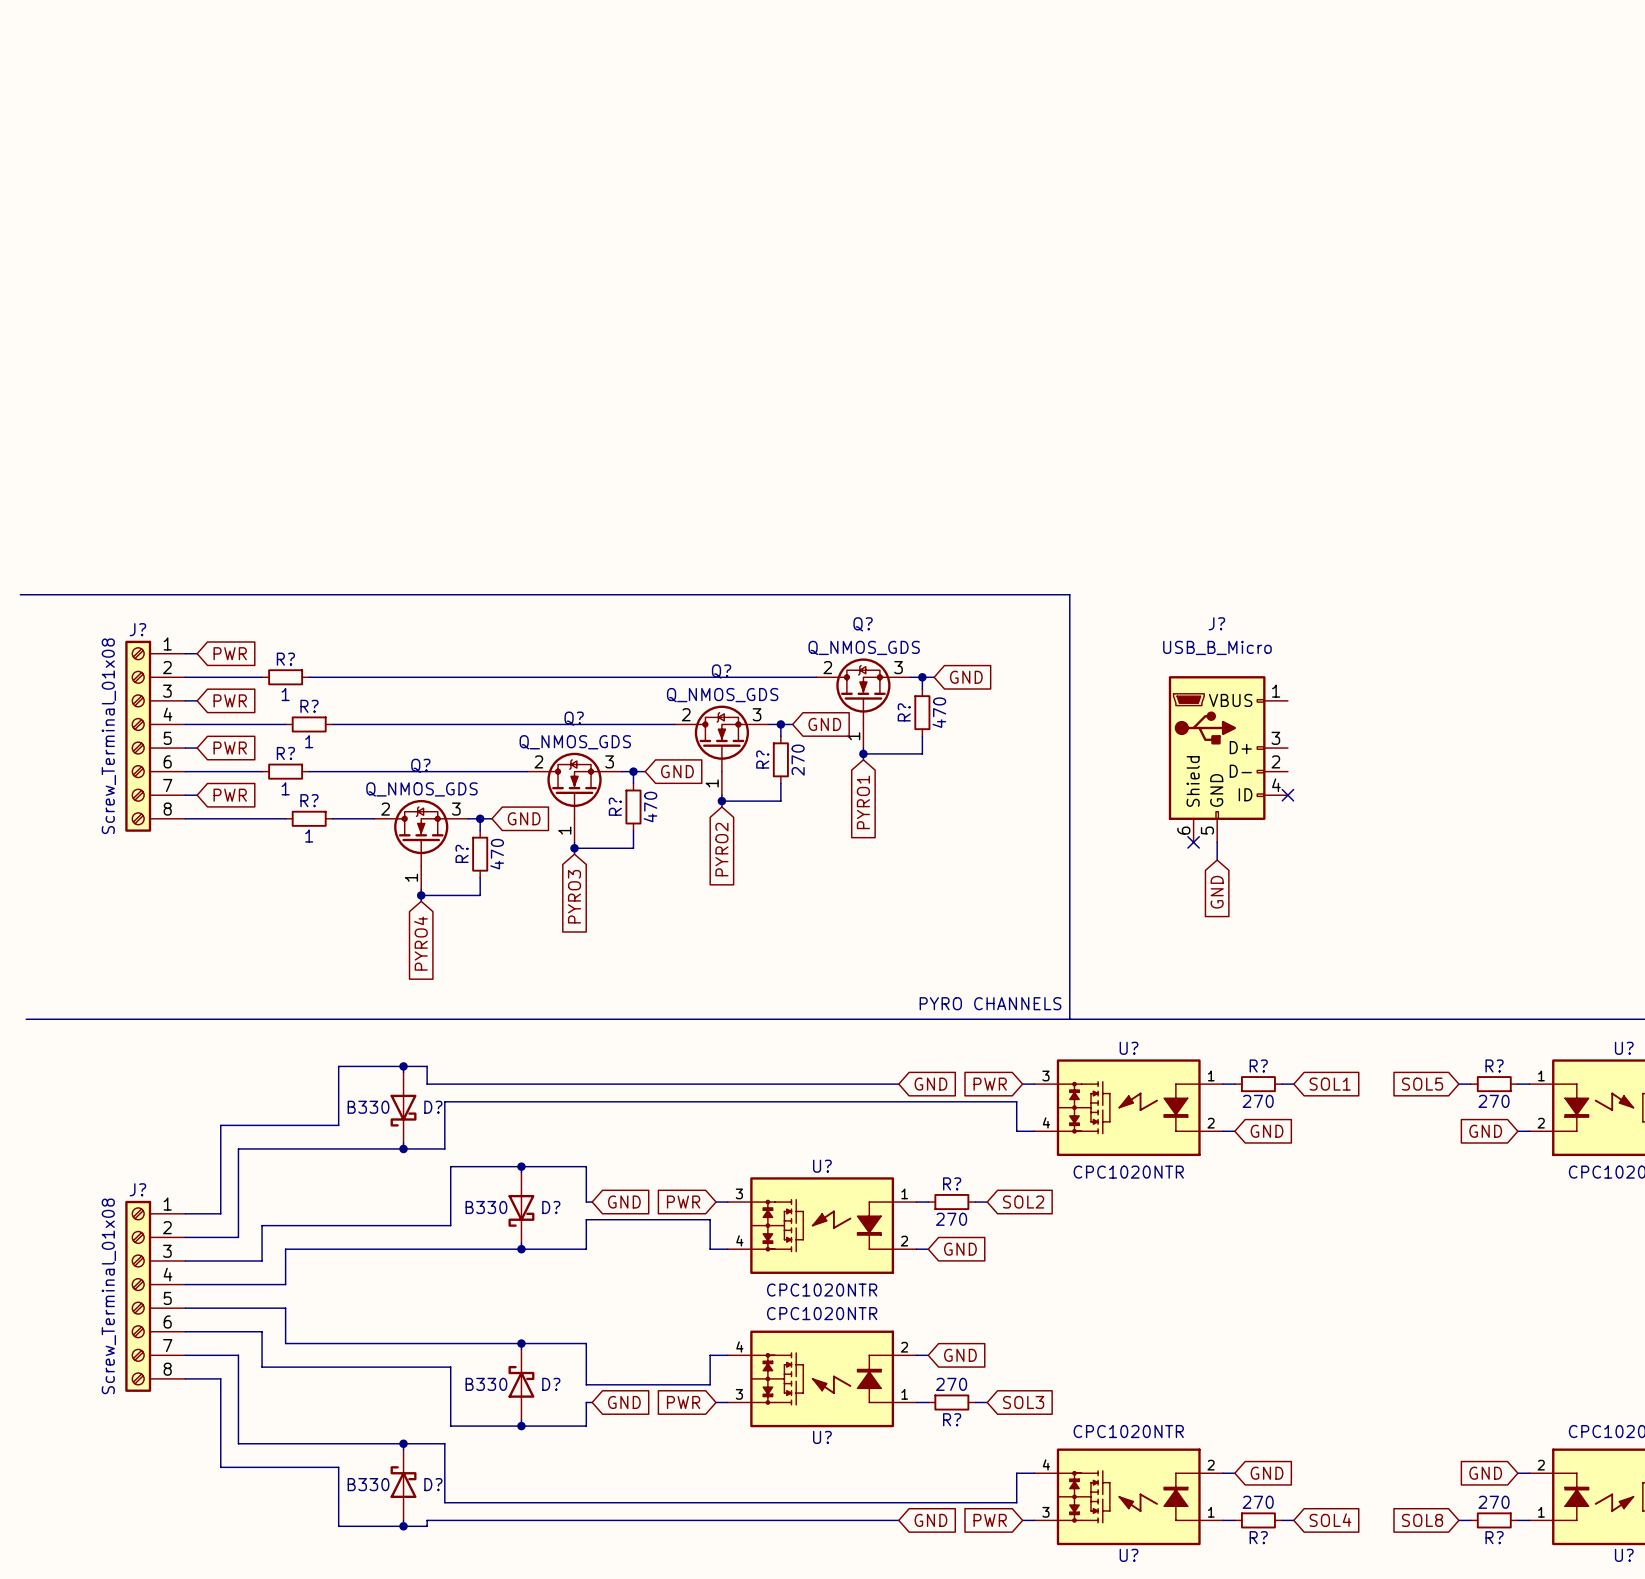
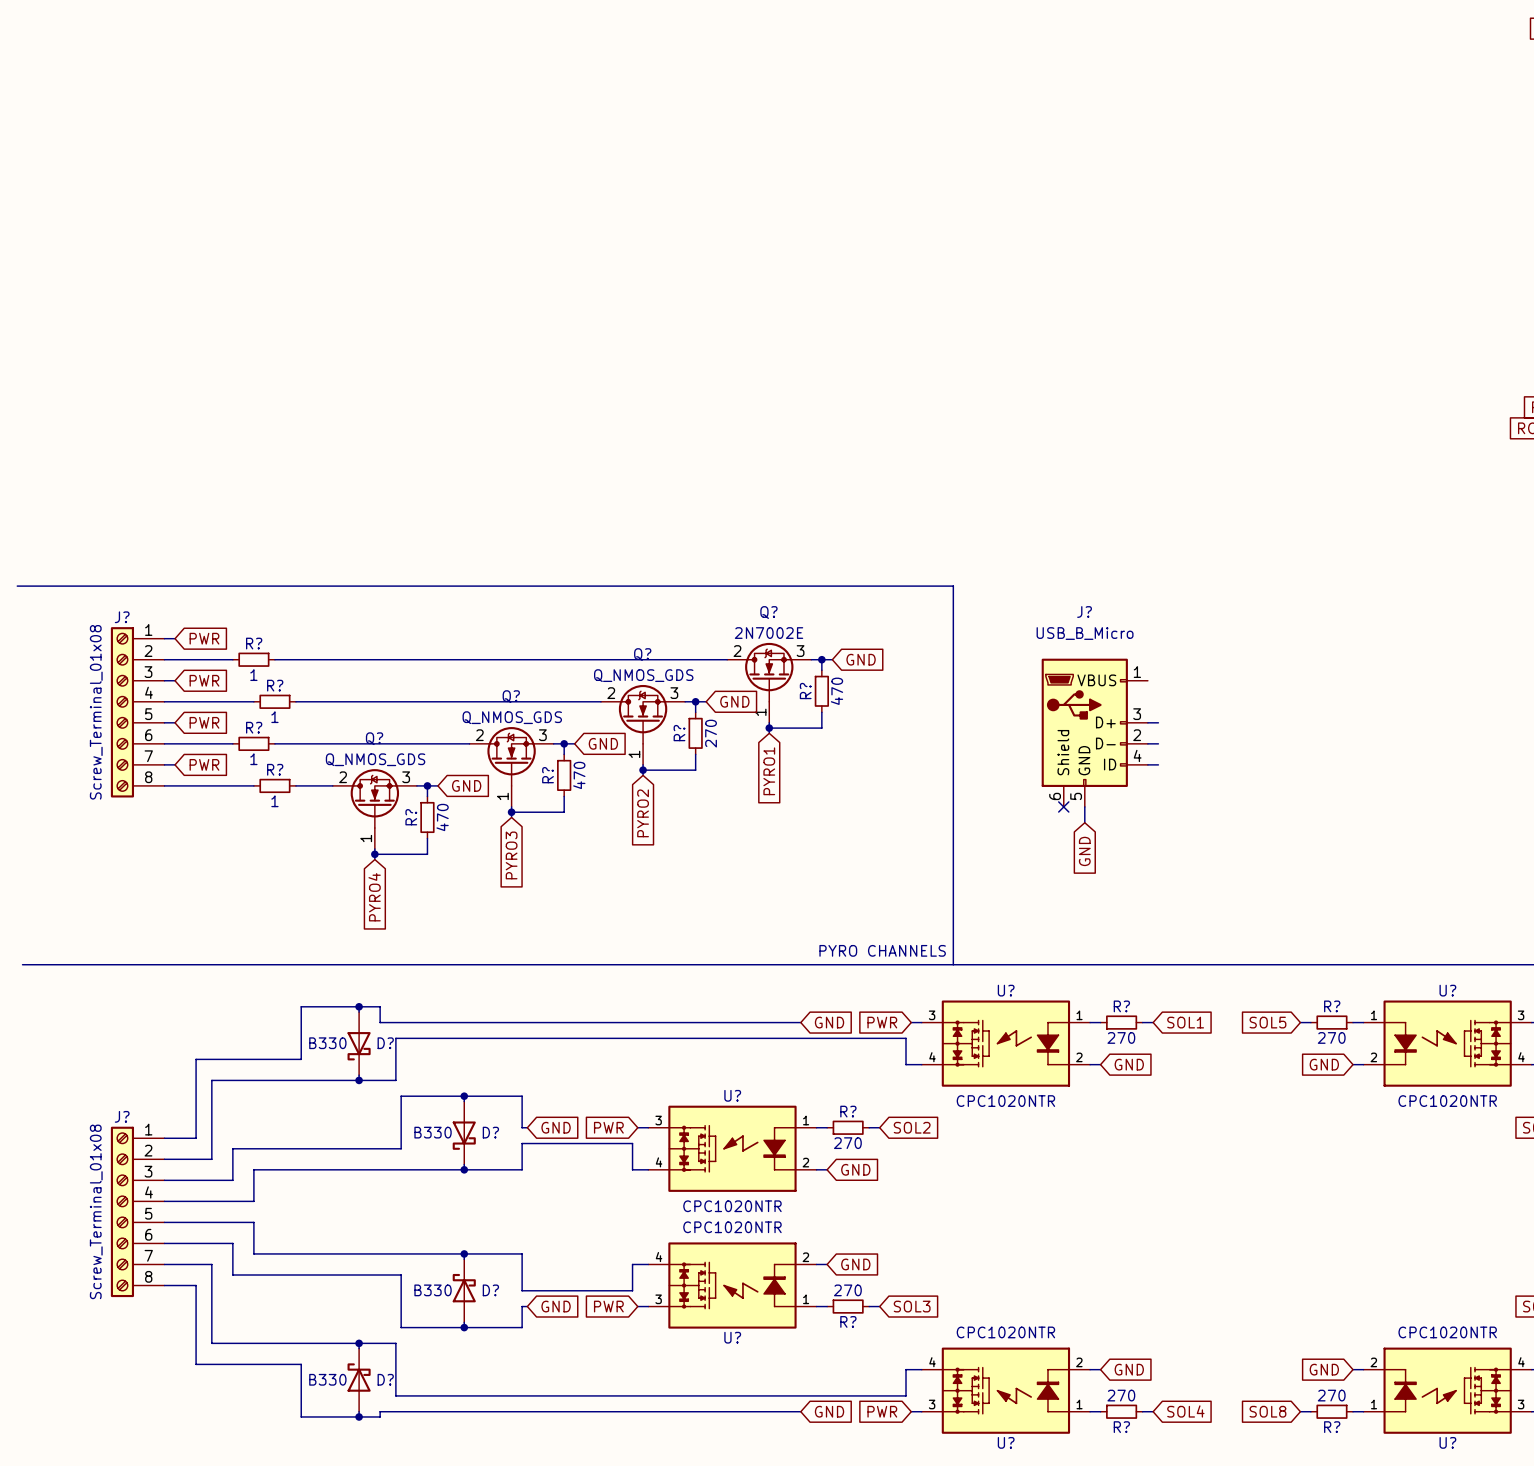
Q? value: Q_NMOS_GDS (864, 647) -> 2N7002E (769, 633)
wire: none -> (1147, 722) (1158, 722)
wire: none -> (1147, 743) (1158, 743)
wire: none -> (1147, 764) (1158, 764)
no-connect mark: (1287, 795) -> none

